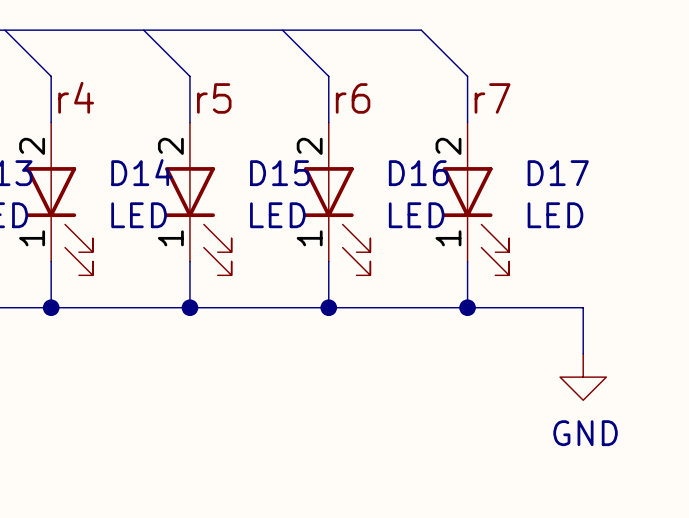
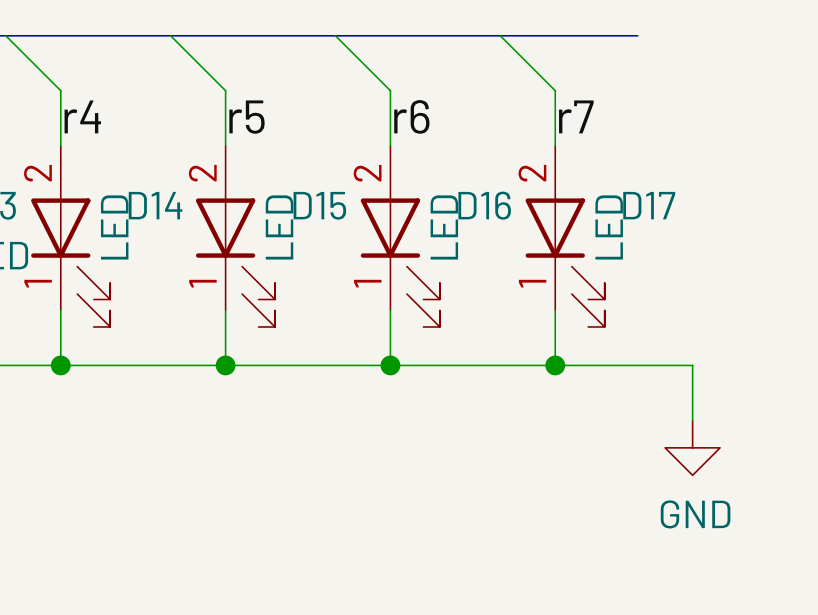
bus: none -> (500, 35) (637, 35)
D14 value rotation: 0° (139, 215) -> 90° counterclockwise (114, 227)
D15 value rotation: 0° (277, 215) -> 90° counterclockwise (279, 227)
D16 value rotation: 0° (416, 215) -> 90° counterclockwise (444, 227)
D17 value rotation: 0° (555, 215) -> 90° counterclockwise (609, 227)

